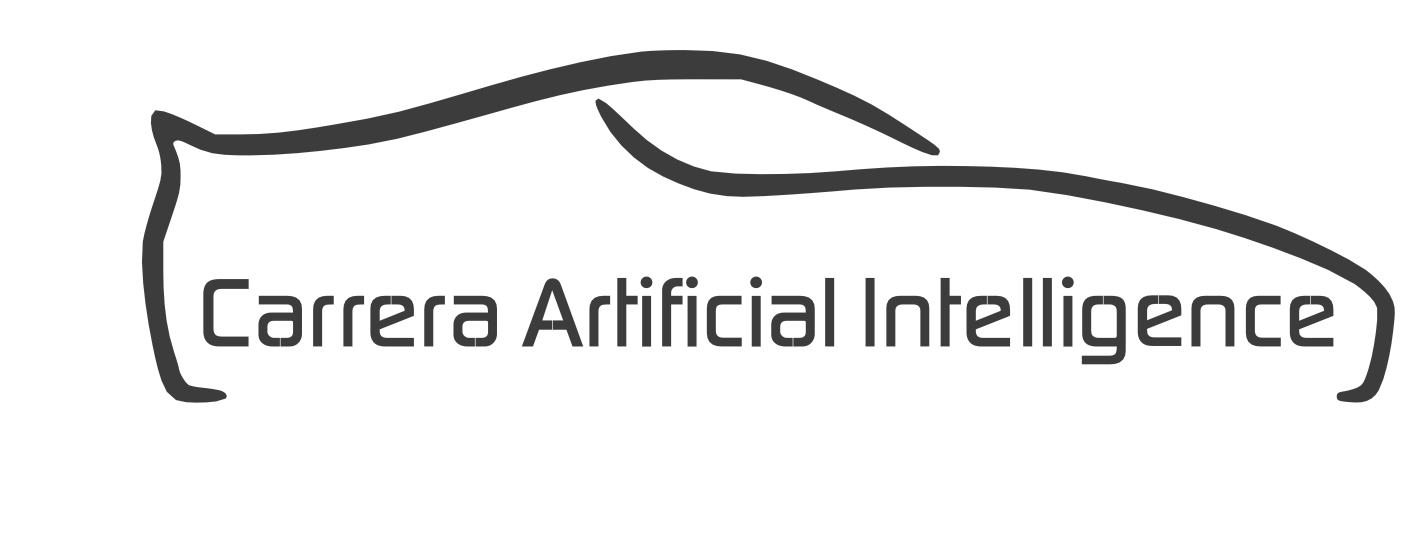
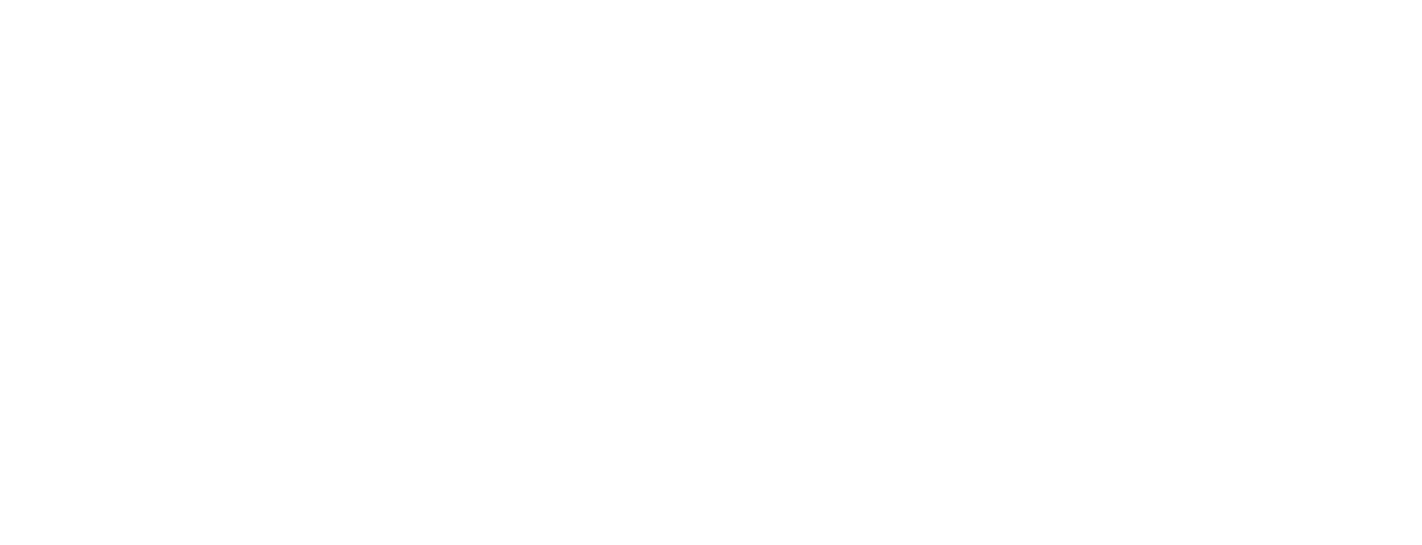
drawing: [141, 50, 1395, 403] -> none

